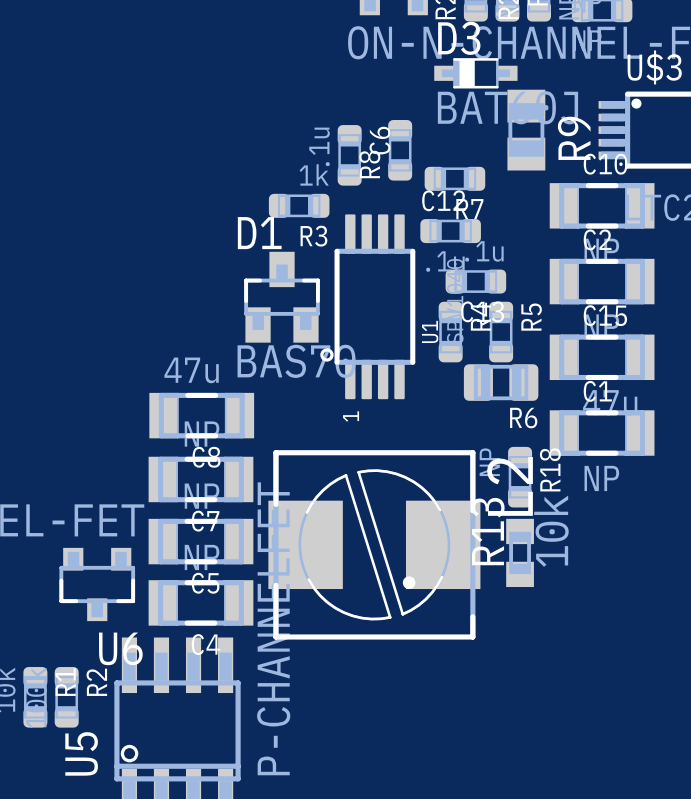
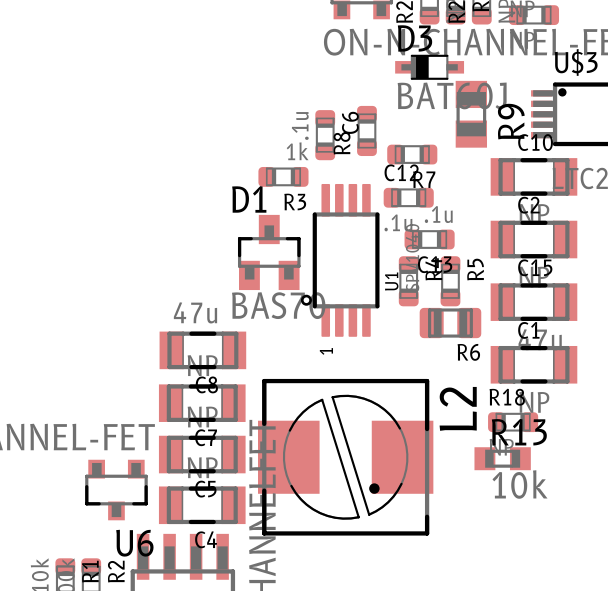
R18 rotation: 0° (520, 477) -> 90° clockwise (513, 422)
R18 position: (520, 477) -> (513, 422)
R13 rotation: 0° (520, 552) -> 90° clockwise (502, 458)
R13 position: (520, 552) -> (502, 458)

